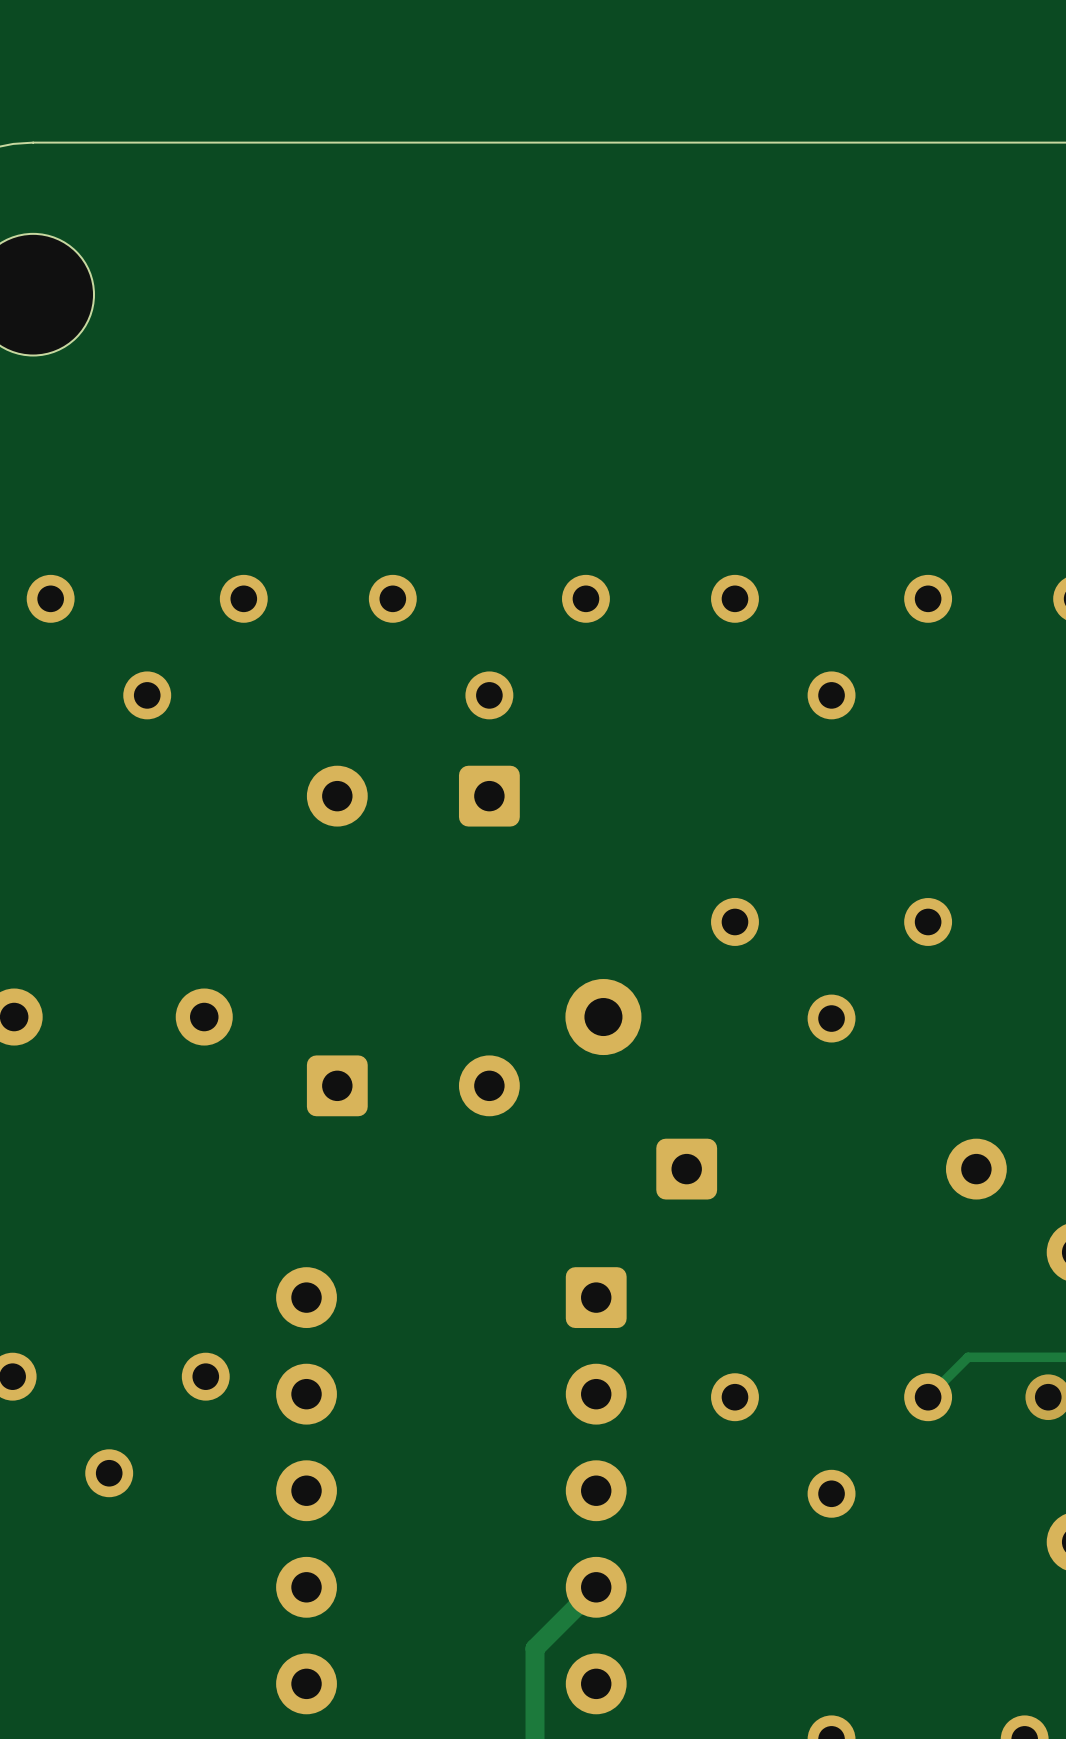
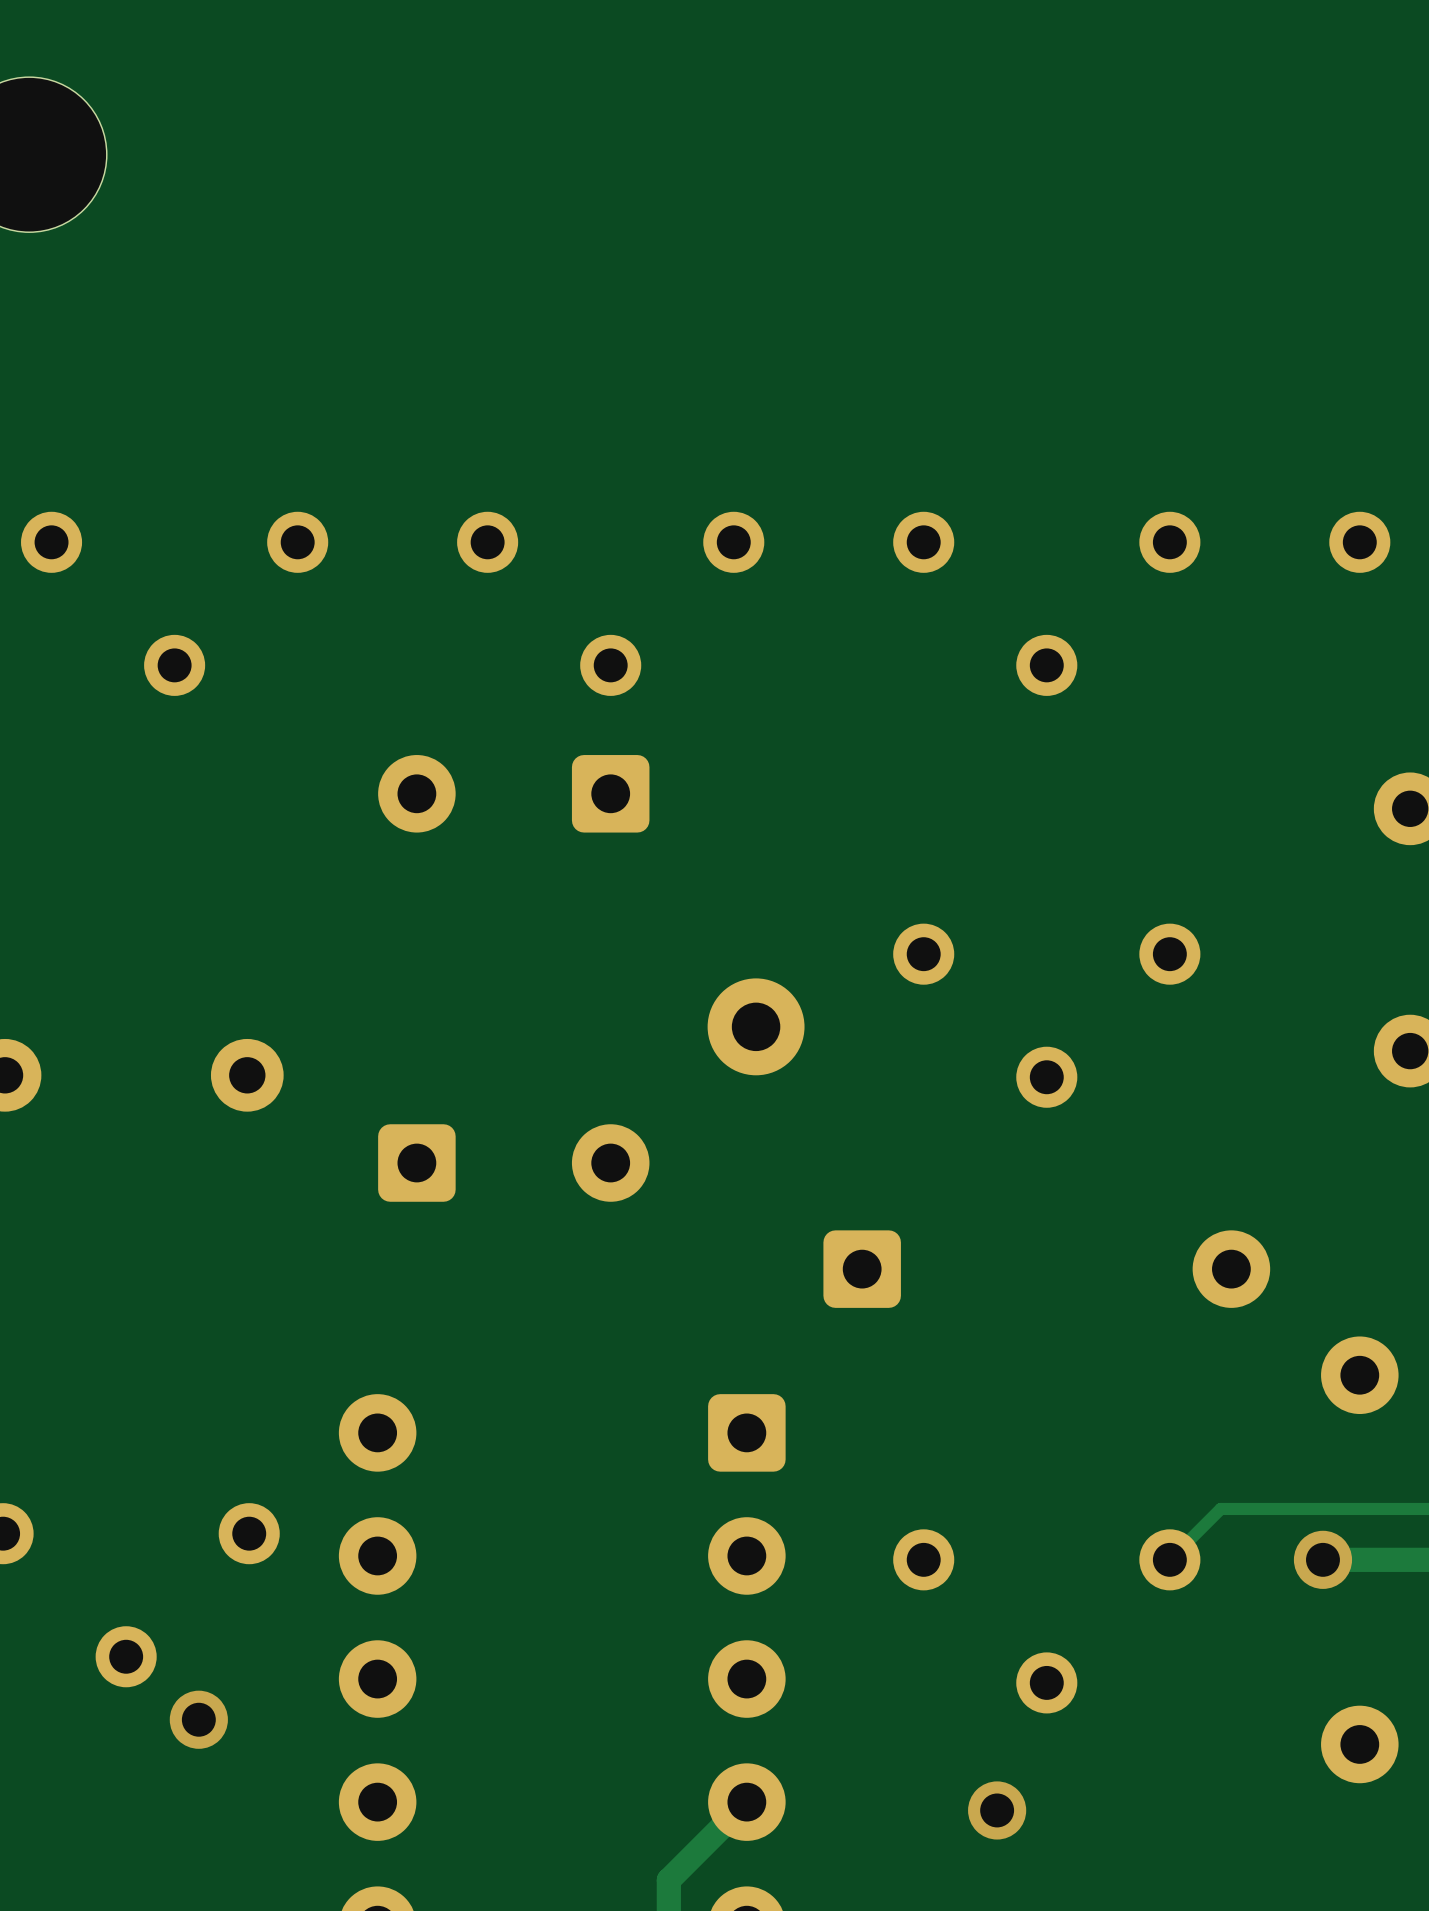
part position: (603, 1017) -> (756, 1026)
via: none -> (198, 1719)
via: none -> (997, 1810)

